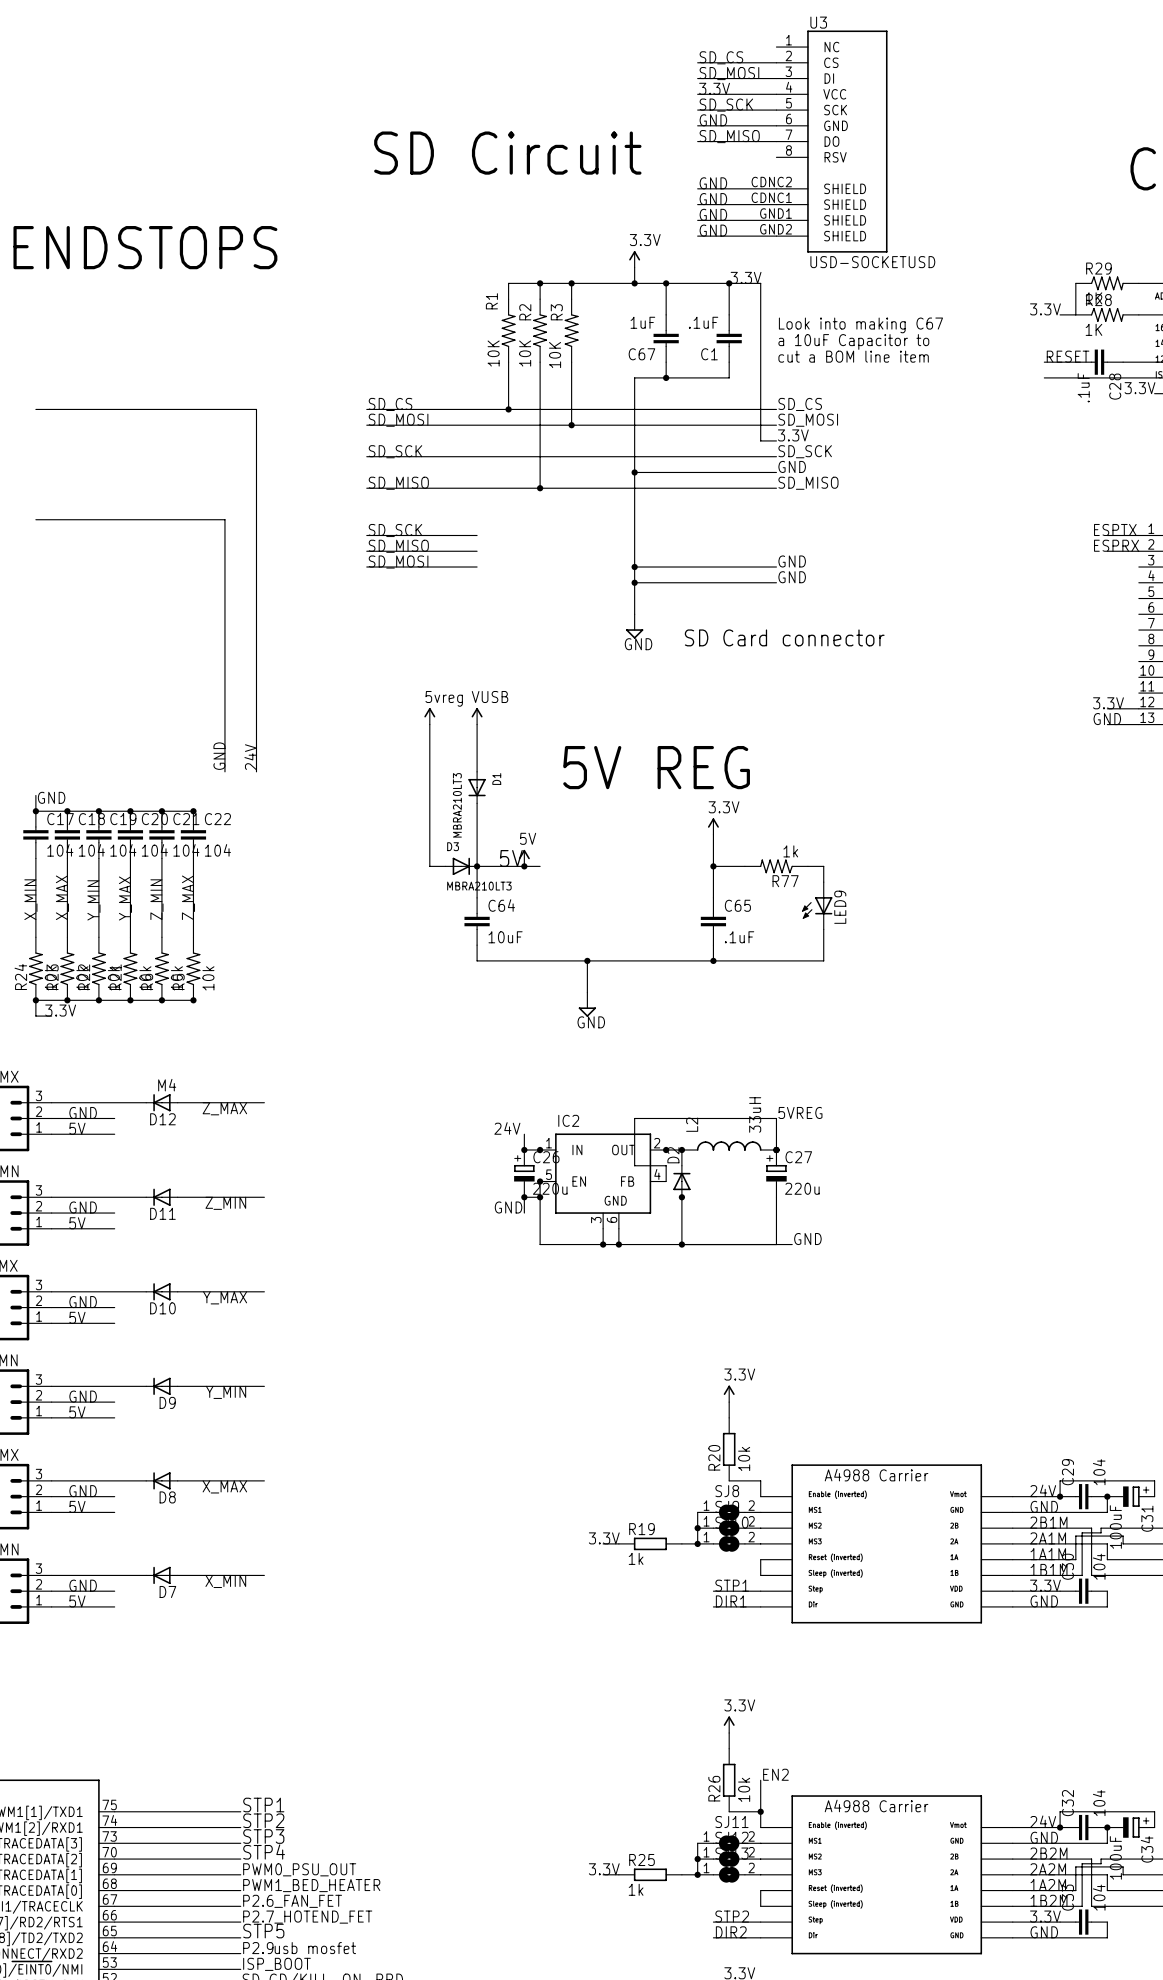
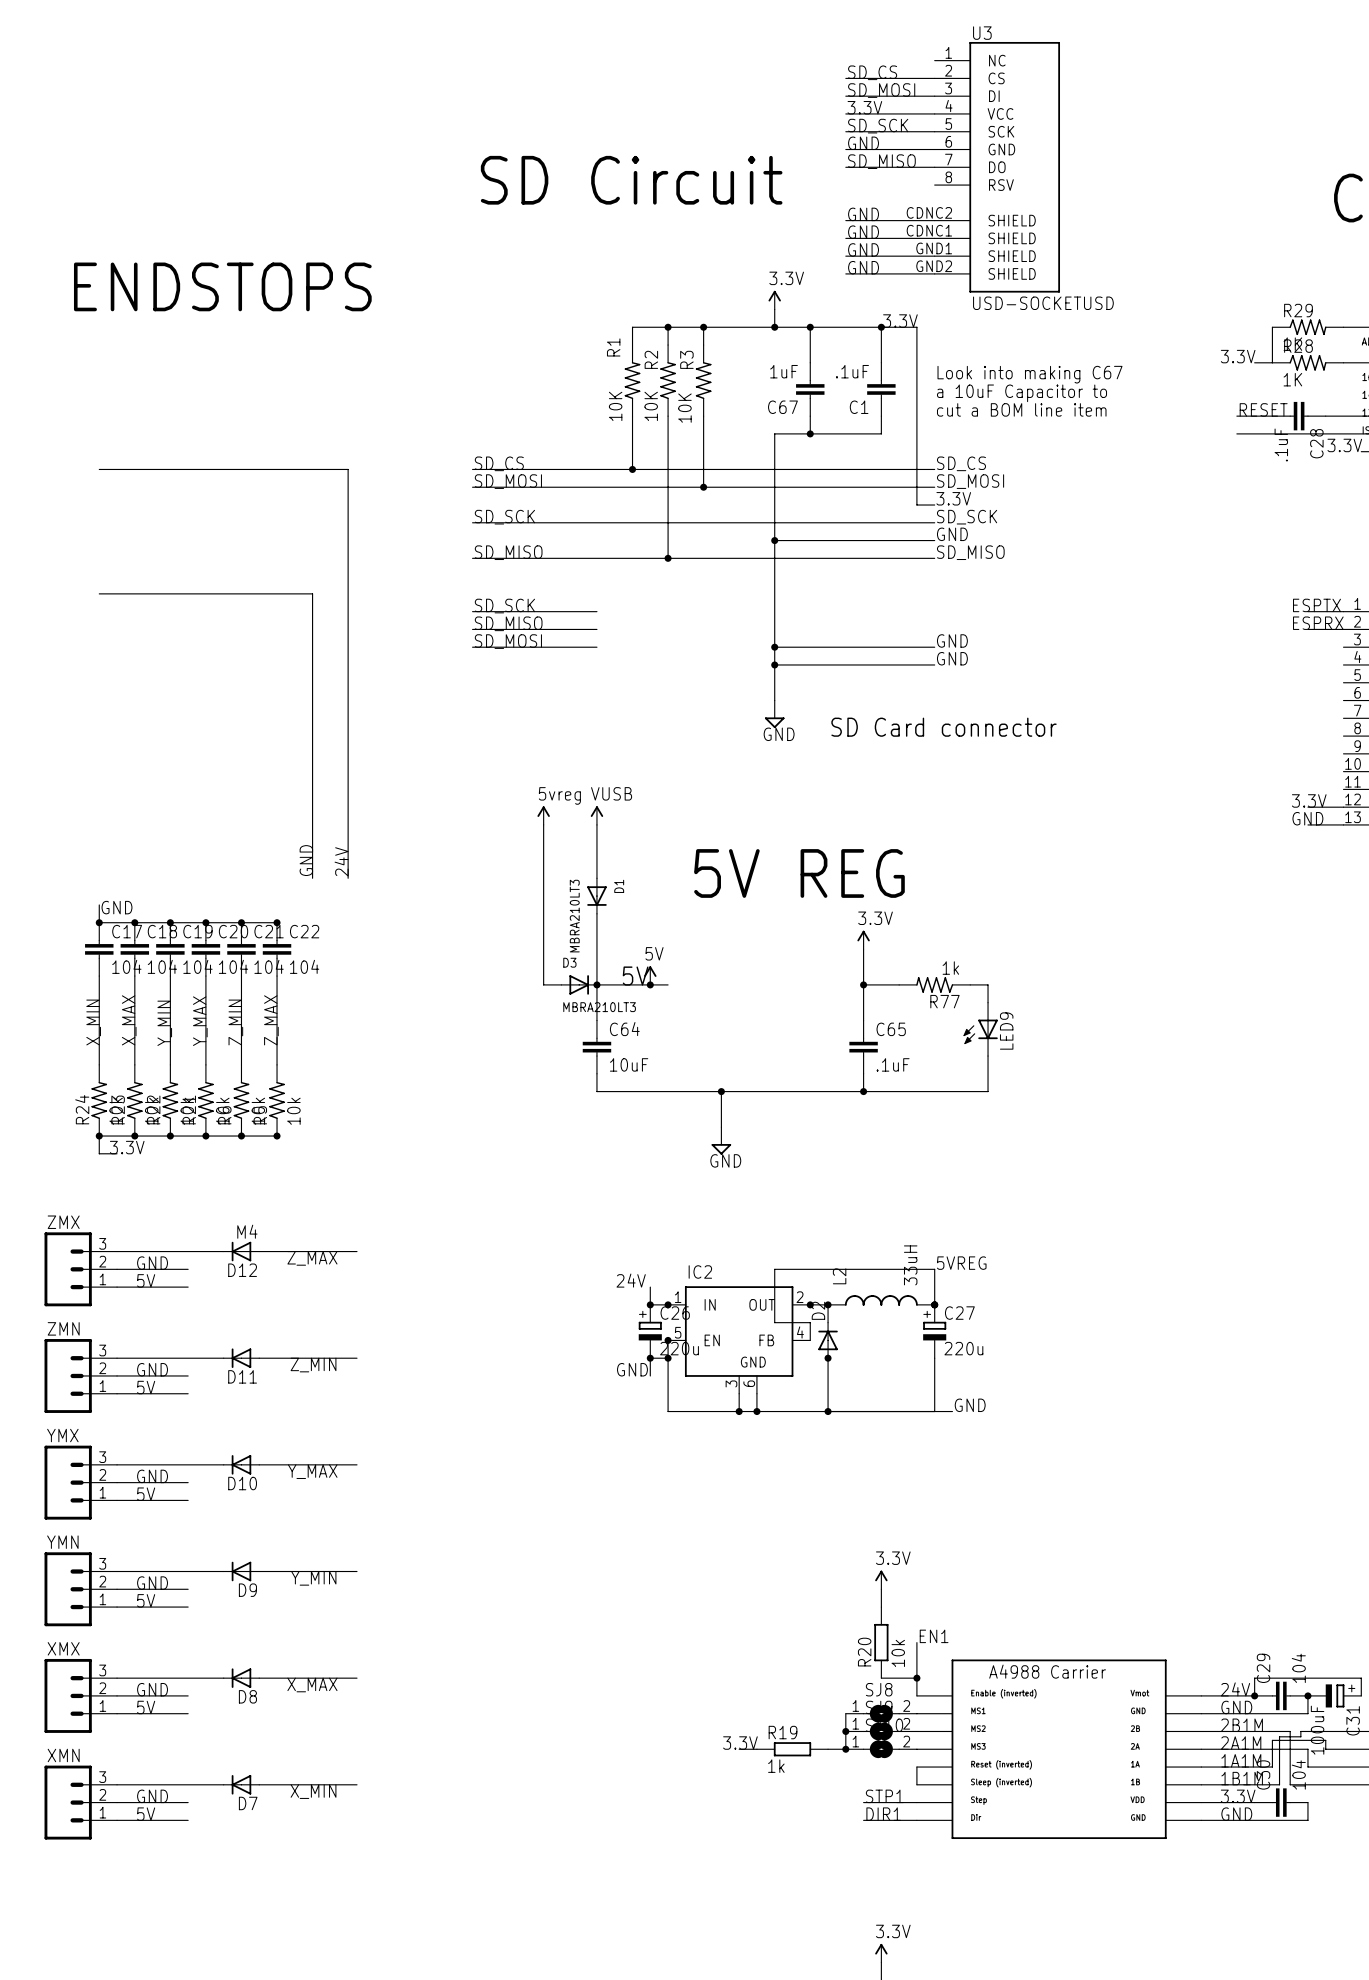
label: none -> EN1 (934, 1636)
wire: none -> (916, 1642) (916, 1678)
junction: none -> (916, 1678)

